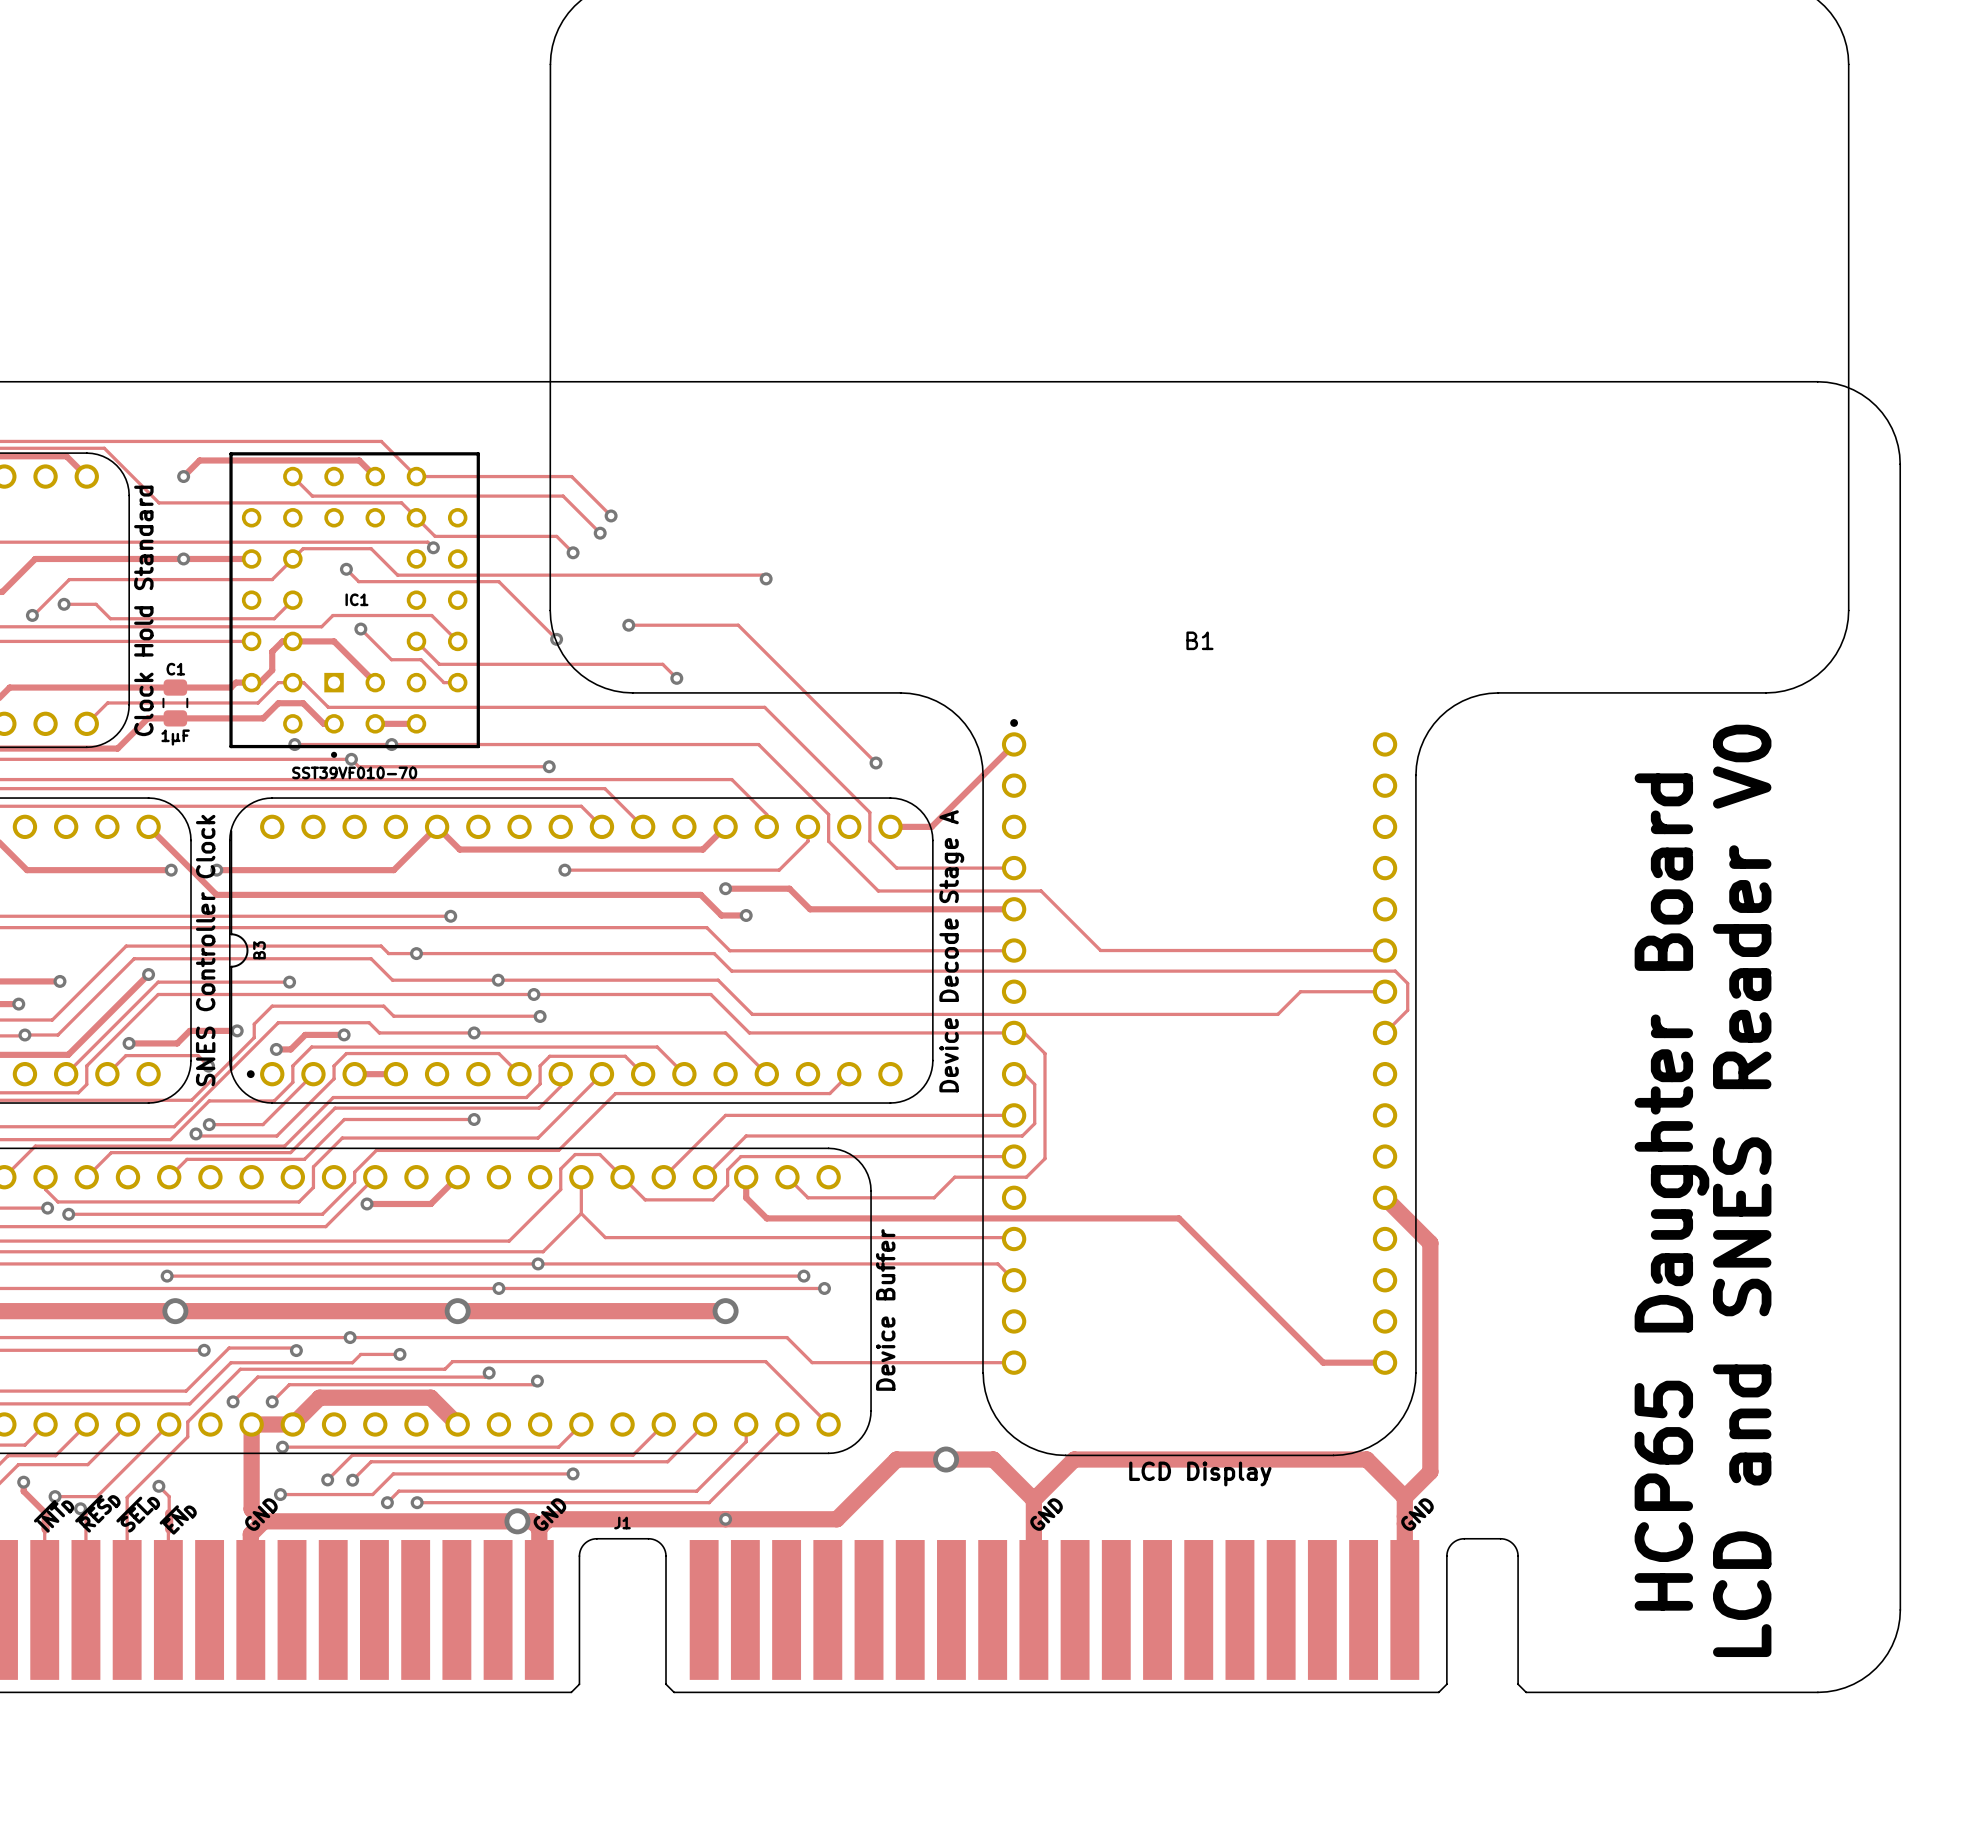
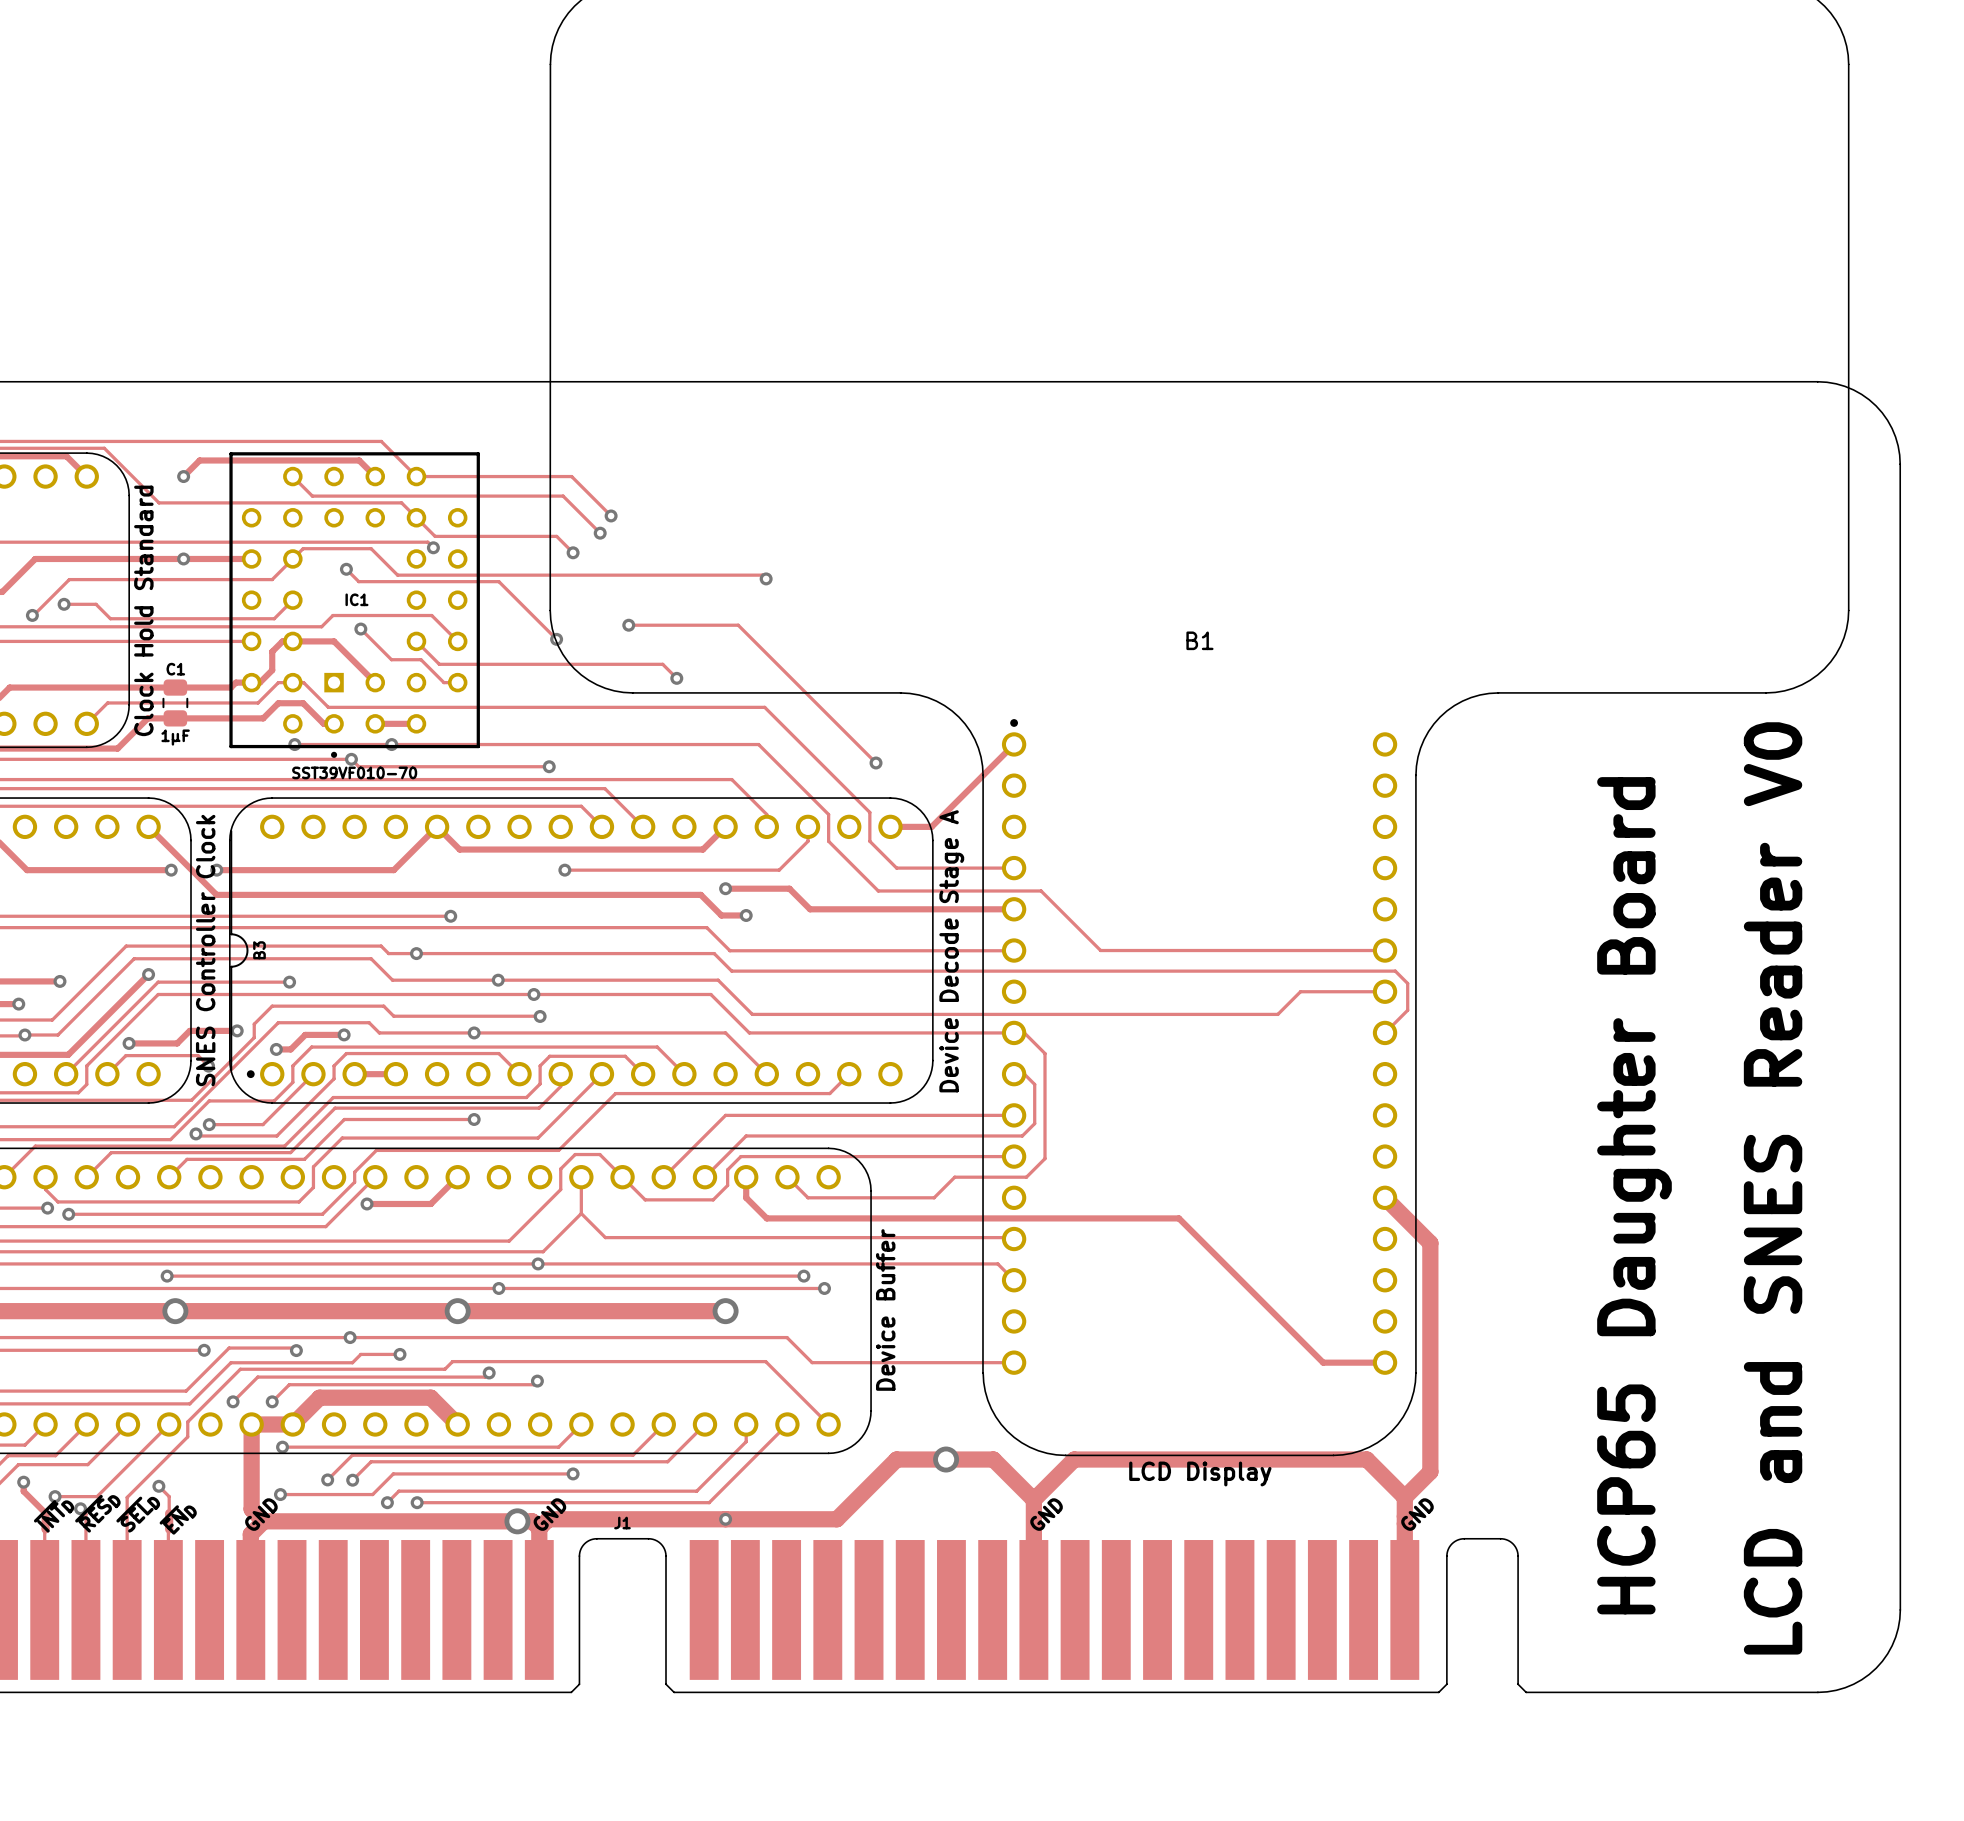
text position: LCD and SNES Reader V0 (1742, 1190) -> LCD and SNES Reader V0 (1773, 1188)
text position: HCP65 Daughter Board (1671, 1192) -> HCP65 Daughter Board (1634, 1195)

